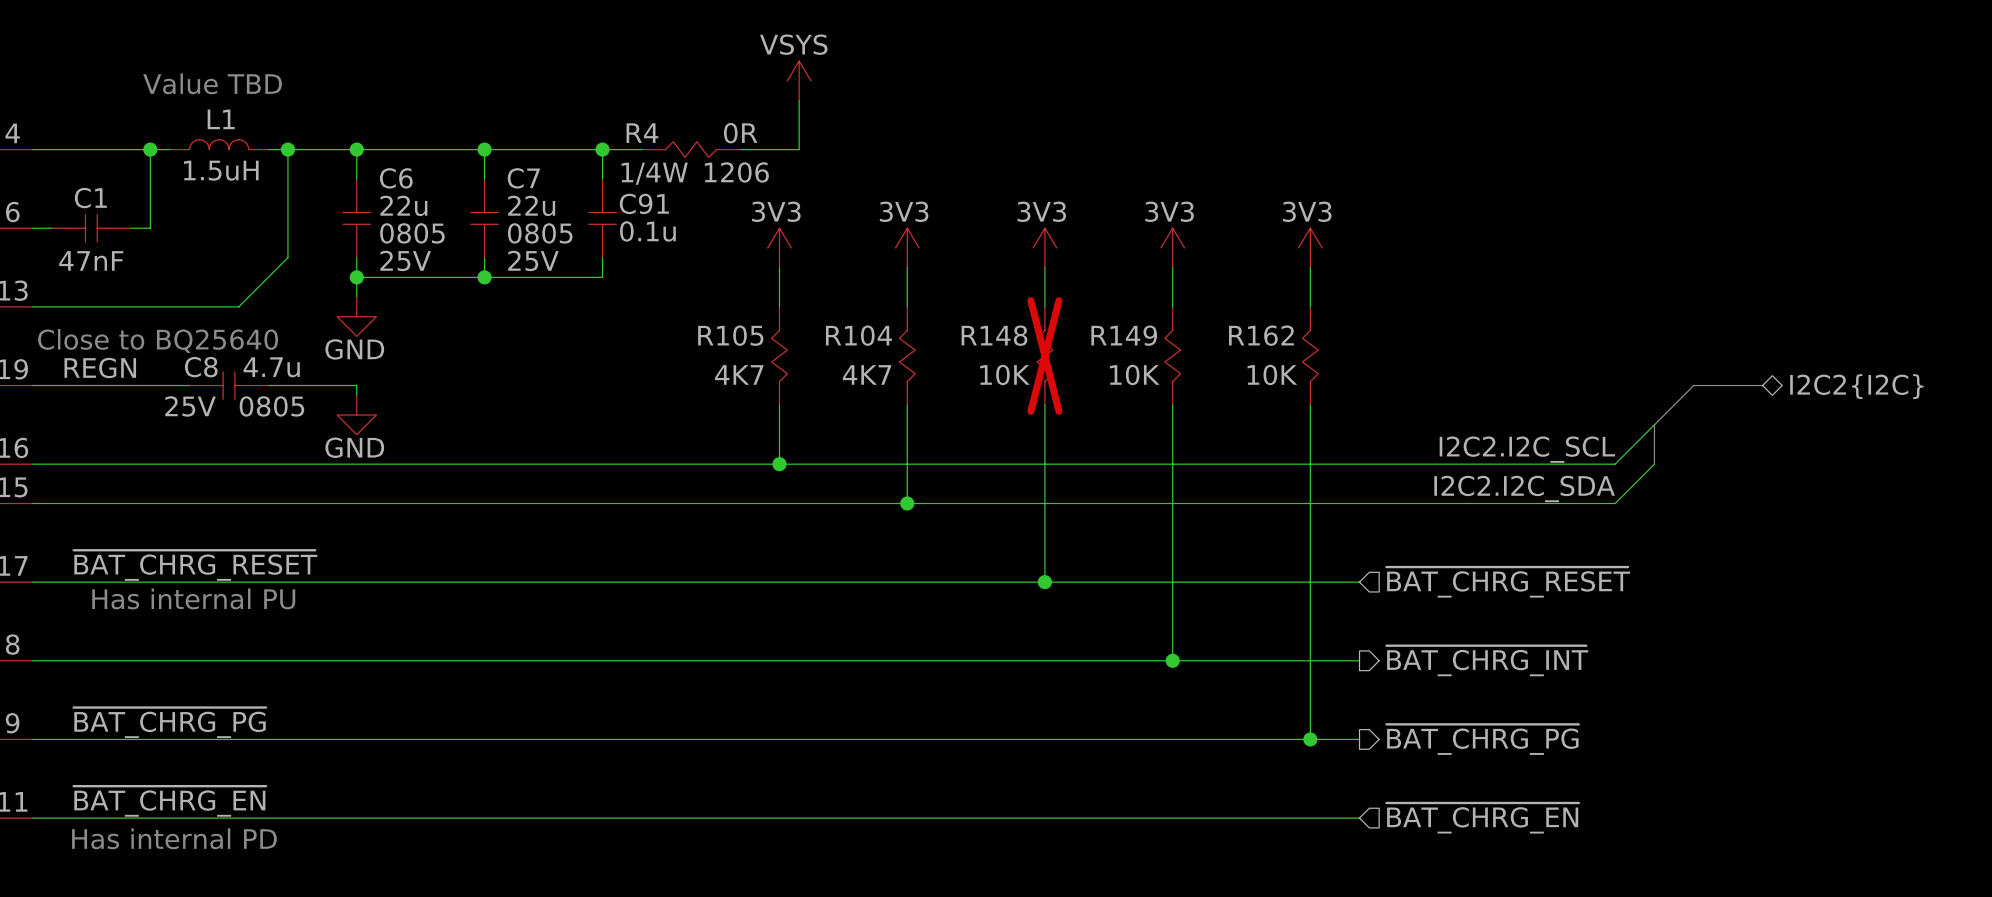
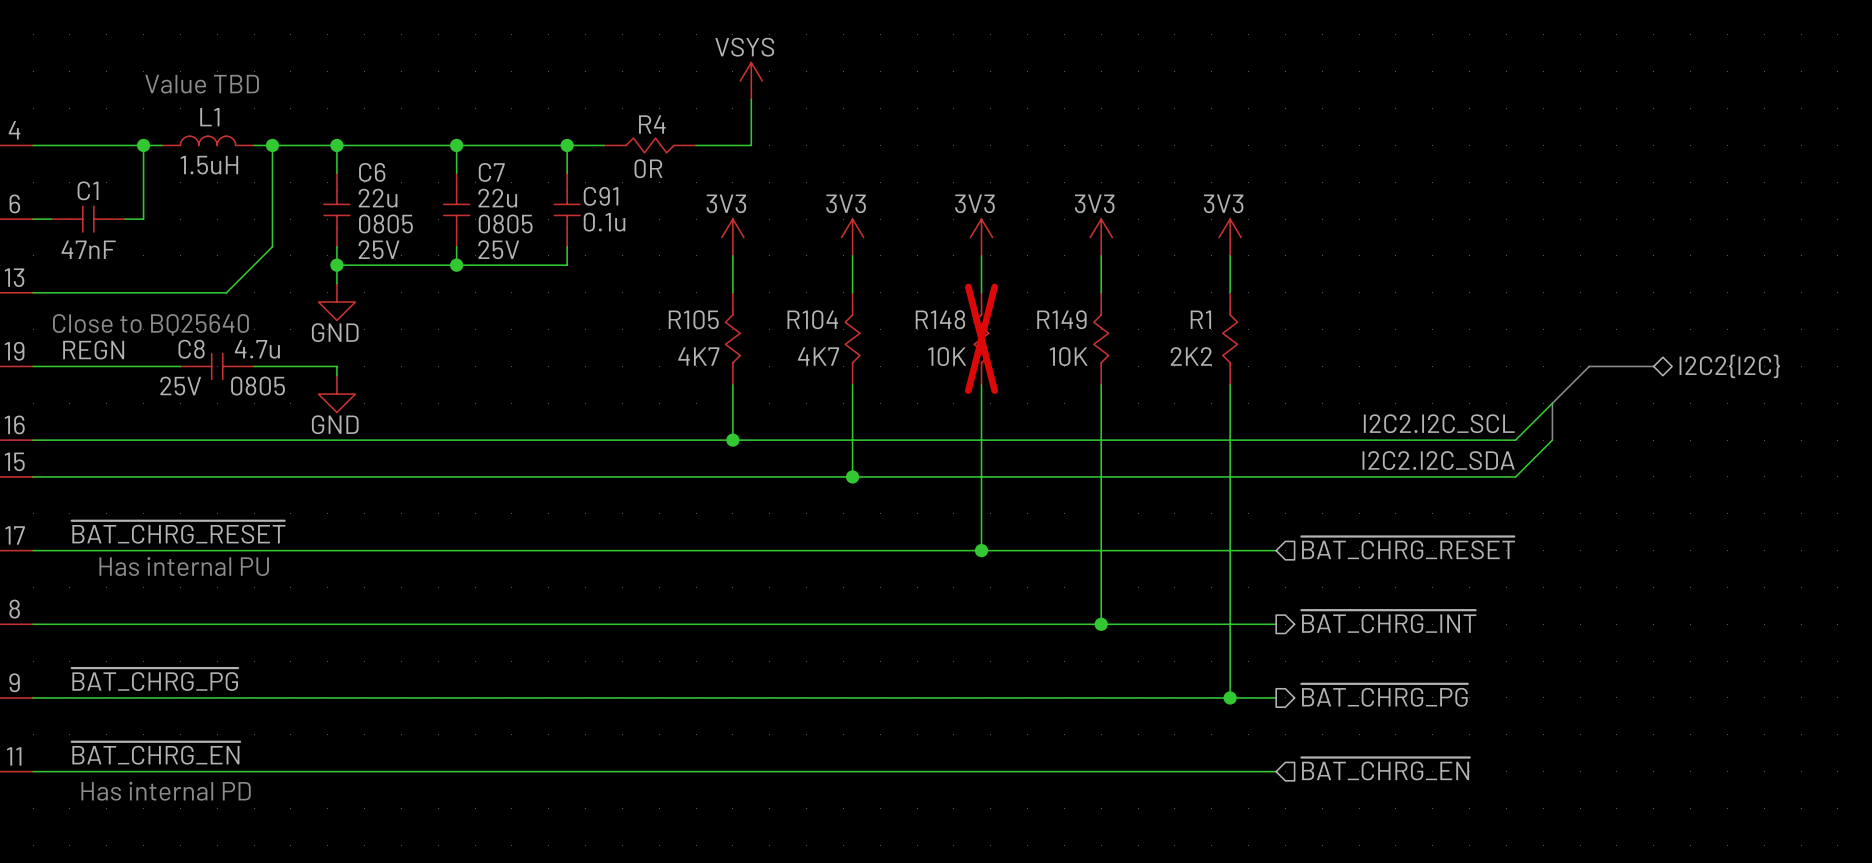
R4 name position: R4 (642, 133) -> R4 (652, 124)
R4 value position: 0R (740, 133) -> 0R (648, 168)
R4 text: 1206 (736, 172) -> none
R4 text: 1/4W (654, 173) -> none
R162: 10K (1310, 356) -> none
R1: none -> 2K2 (1230, 338)

